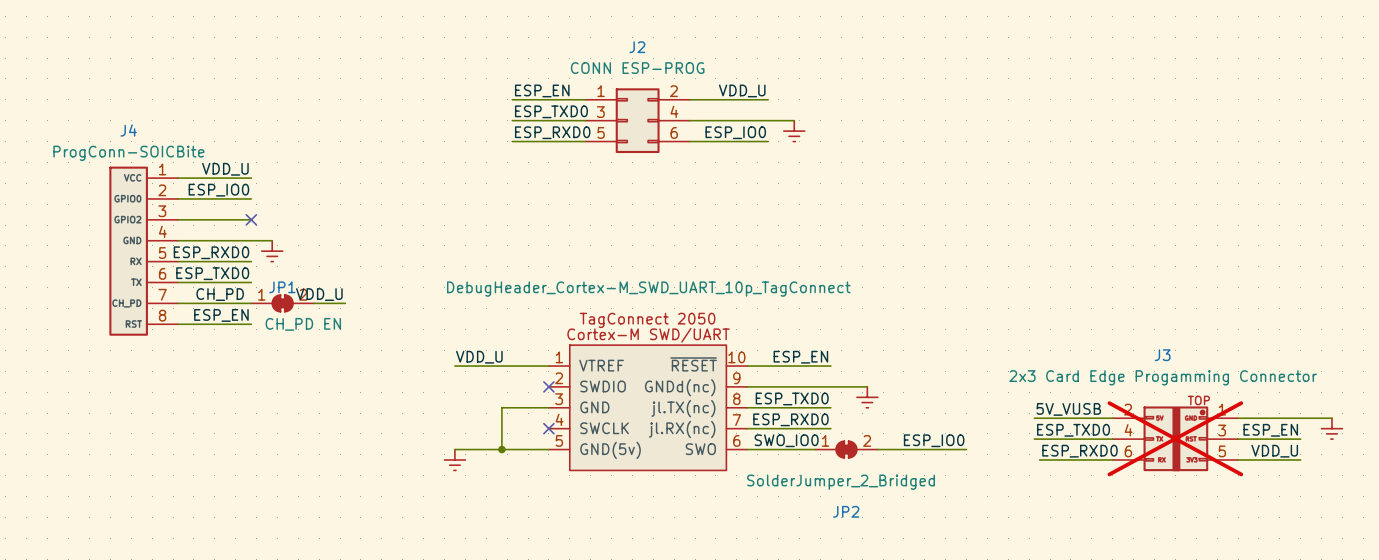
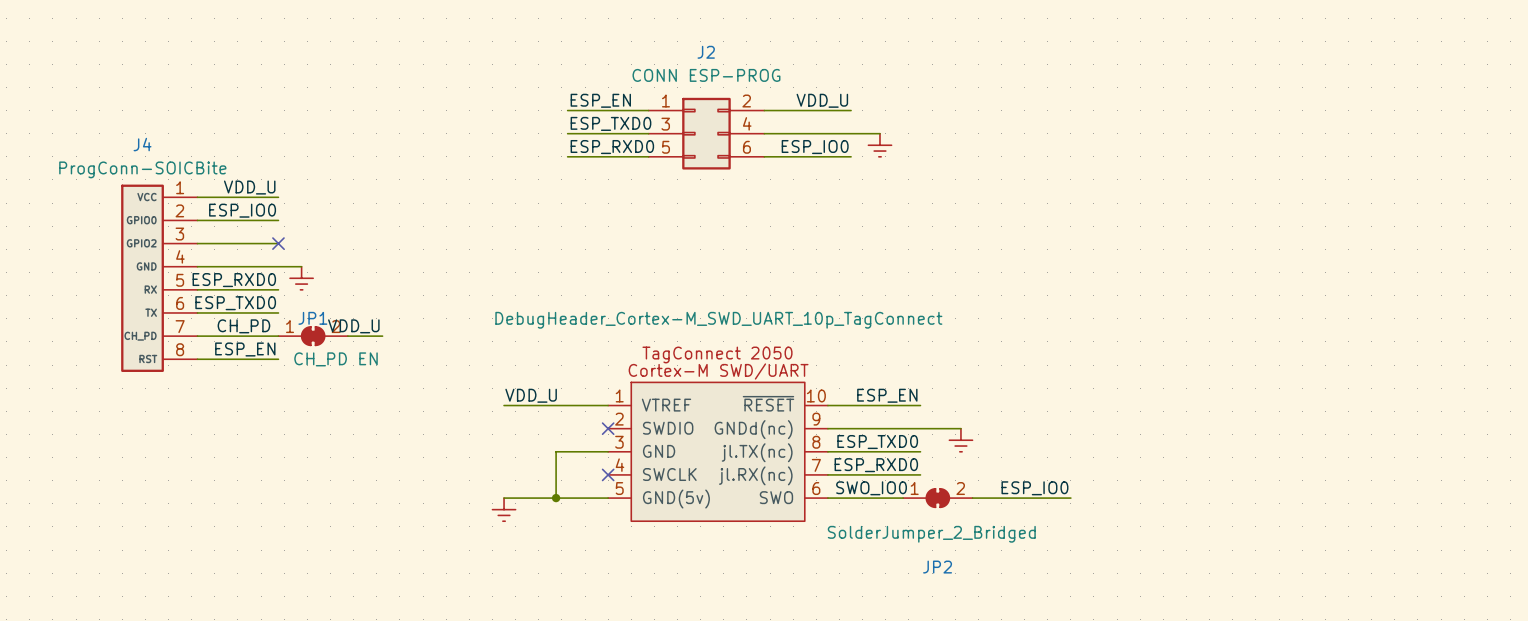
label: 5V_VUSB (1068, 409) -> none
wire: (1034, 418) (1112, 418) -> none
wire: (1238, 418) (1331, 418) -> none
power symbol: (1331, 428) -> none
label: ESP_TXD0 (1073, 430) -> none
label: ESP_EN (1270, 430) -> none
J3: 2x3 Card Edge Progamming Connector (1175, 438) -> none
wire: (1034, 439) (1112, 439) -> none
wire: (1238, 439) (1300, 439) -> none
label: ESP_RXD0 (1079, 451) -> none
label: VDD_U (1274, 451) -> none
wire: (1039, 459) (1112, 459) -> none
wire: (1238, 459) (1300, 459) -> none

